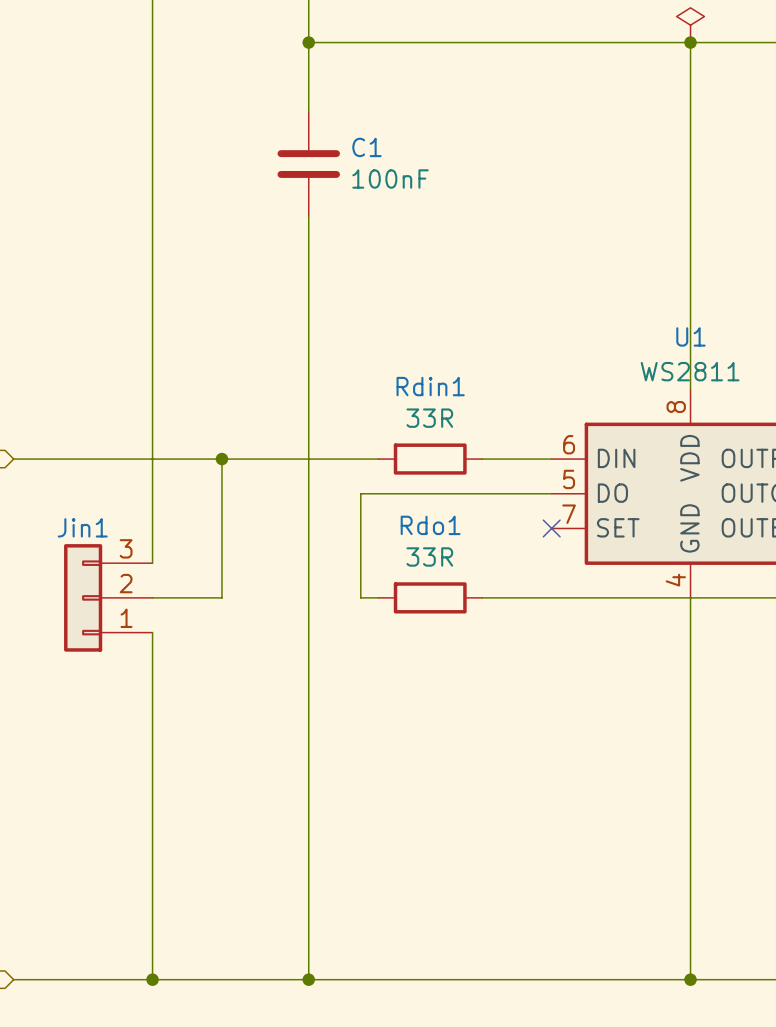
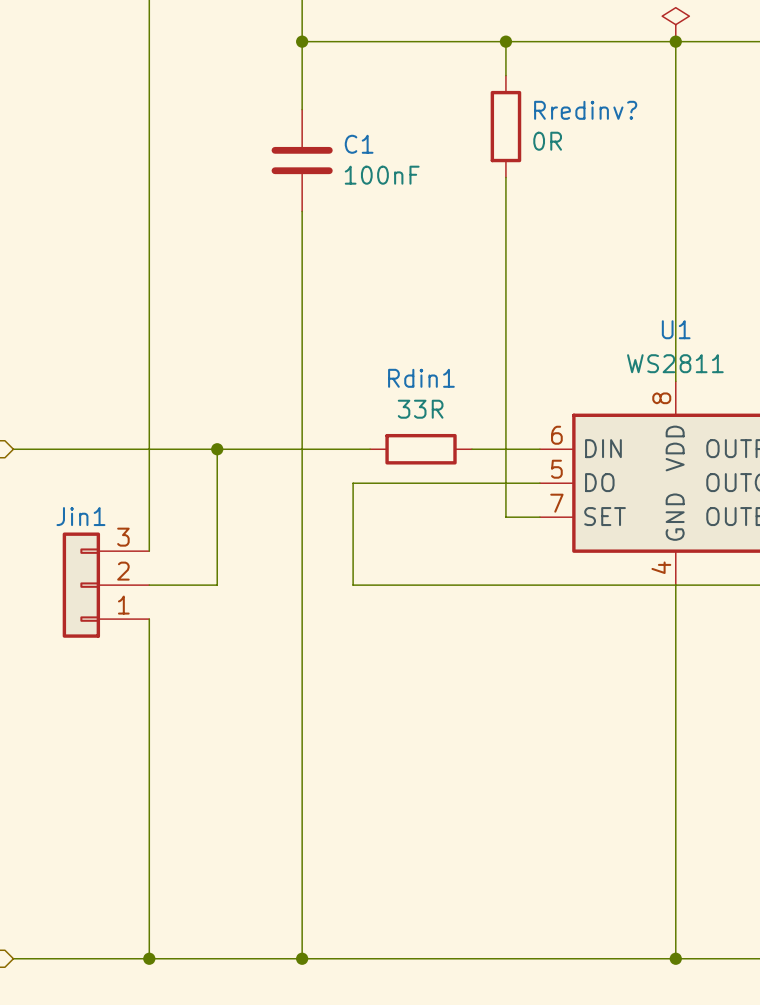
wire: none -> (505, 41) (505, 75)
junction: none -> (505, 41)
Rredinv?: none -> 0R (505, 126)
wire: none -> (505, 177) (505, 517) (539, 517)
no-connect mark: (551, 528) -> none
wire: none -> (370, 585) (471, 585)
Rdo1: 33R (430, 597) -> none

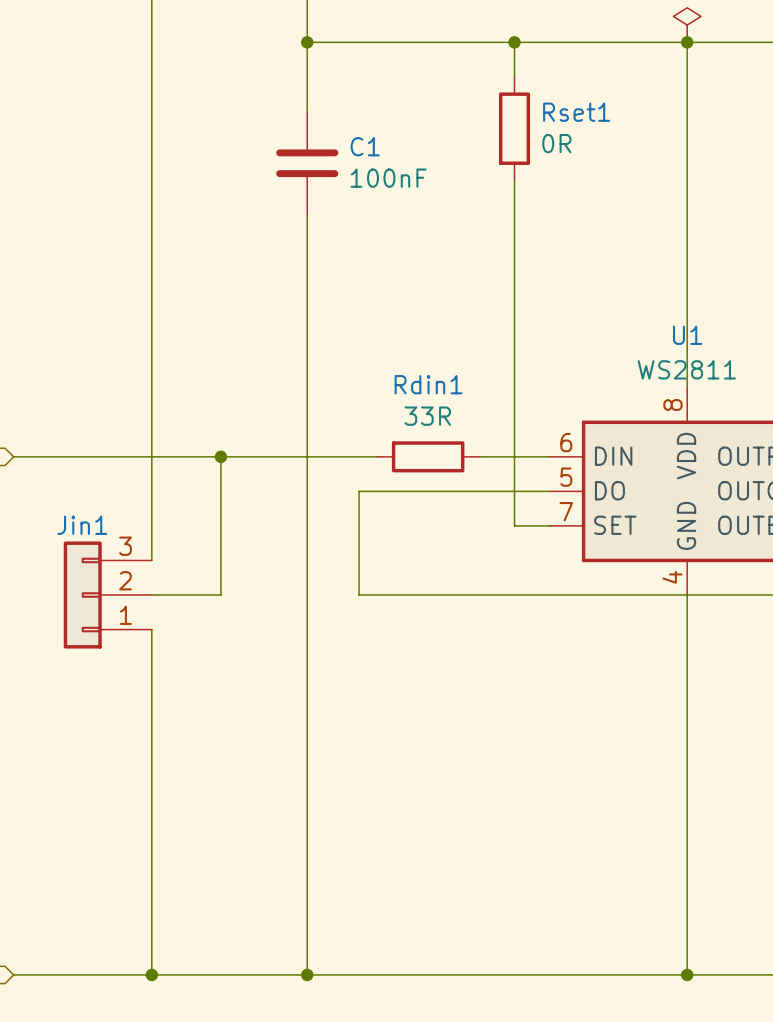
Rredinv? name: Rredinv? (585, 110) -> Rset1 (576, 112)

